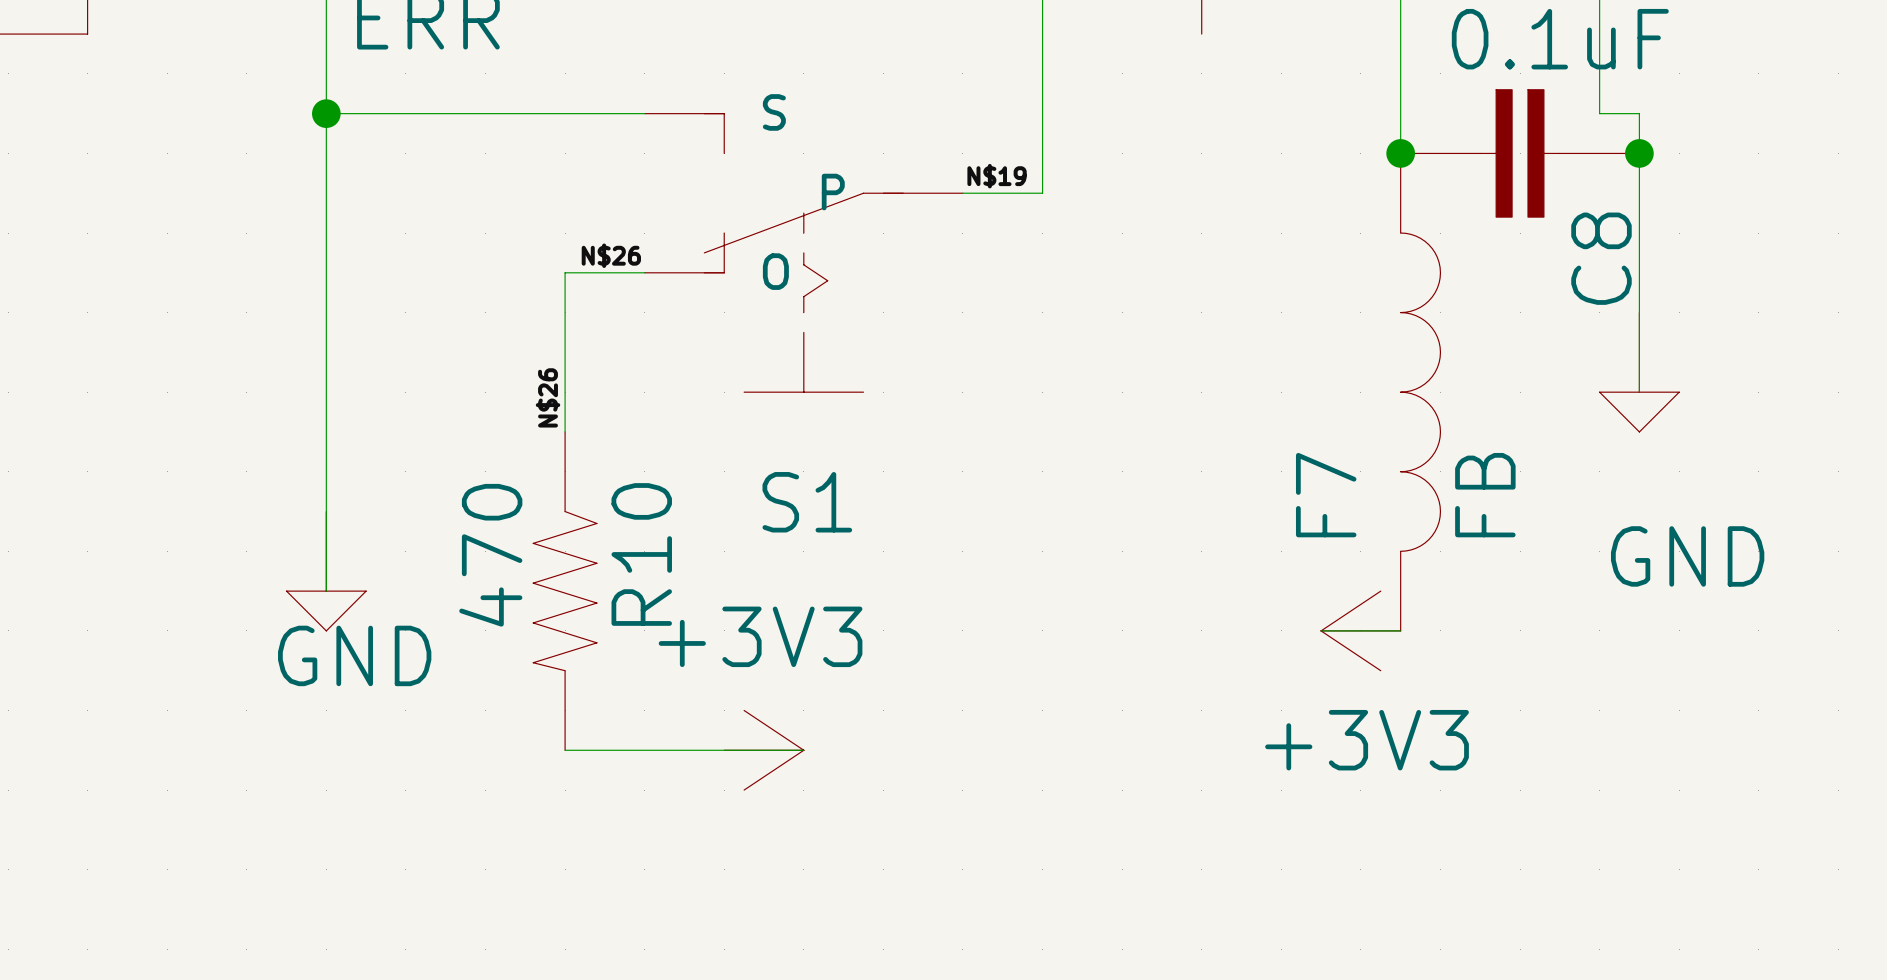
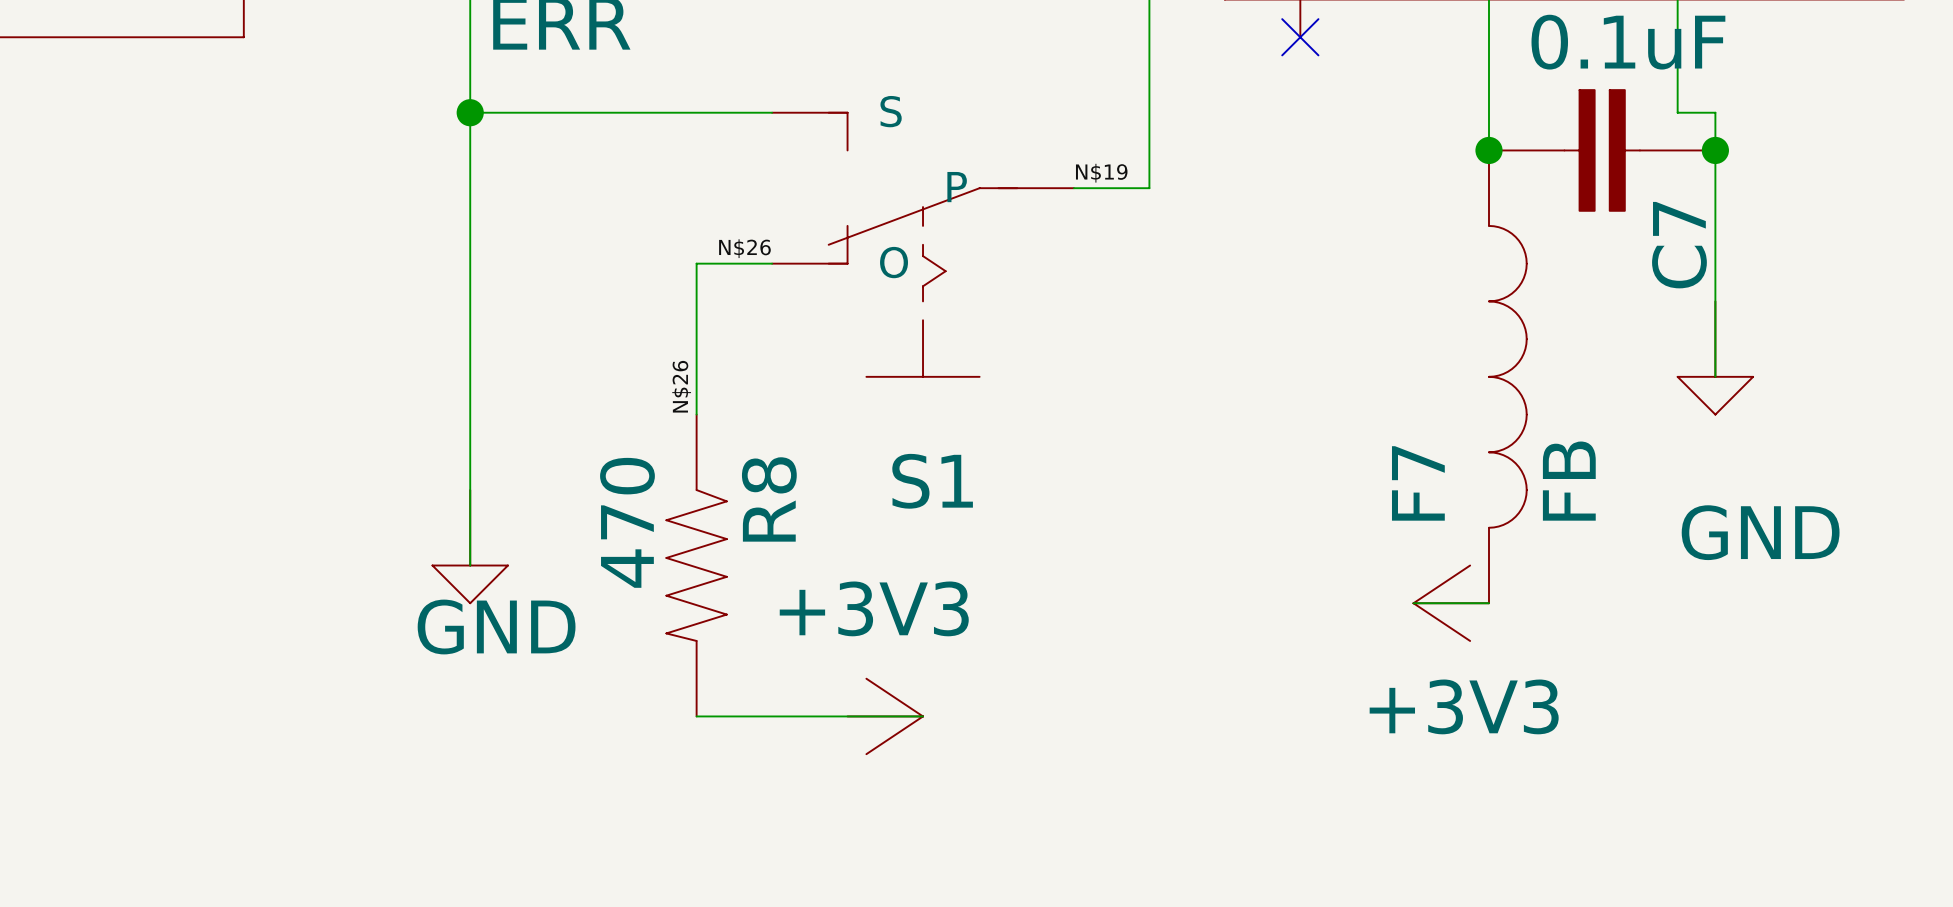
no-connect mark: none -> (1300, 37)
C8 name: C8 (1601, 258) -> C7 (1679, 245)
R10 name: R10 (641, 554) -> R8 (769, 499)

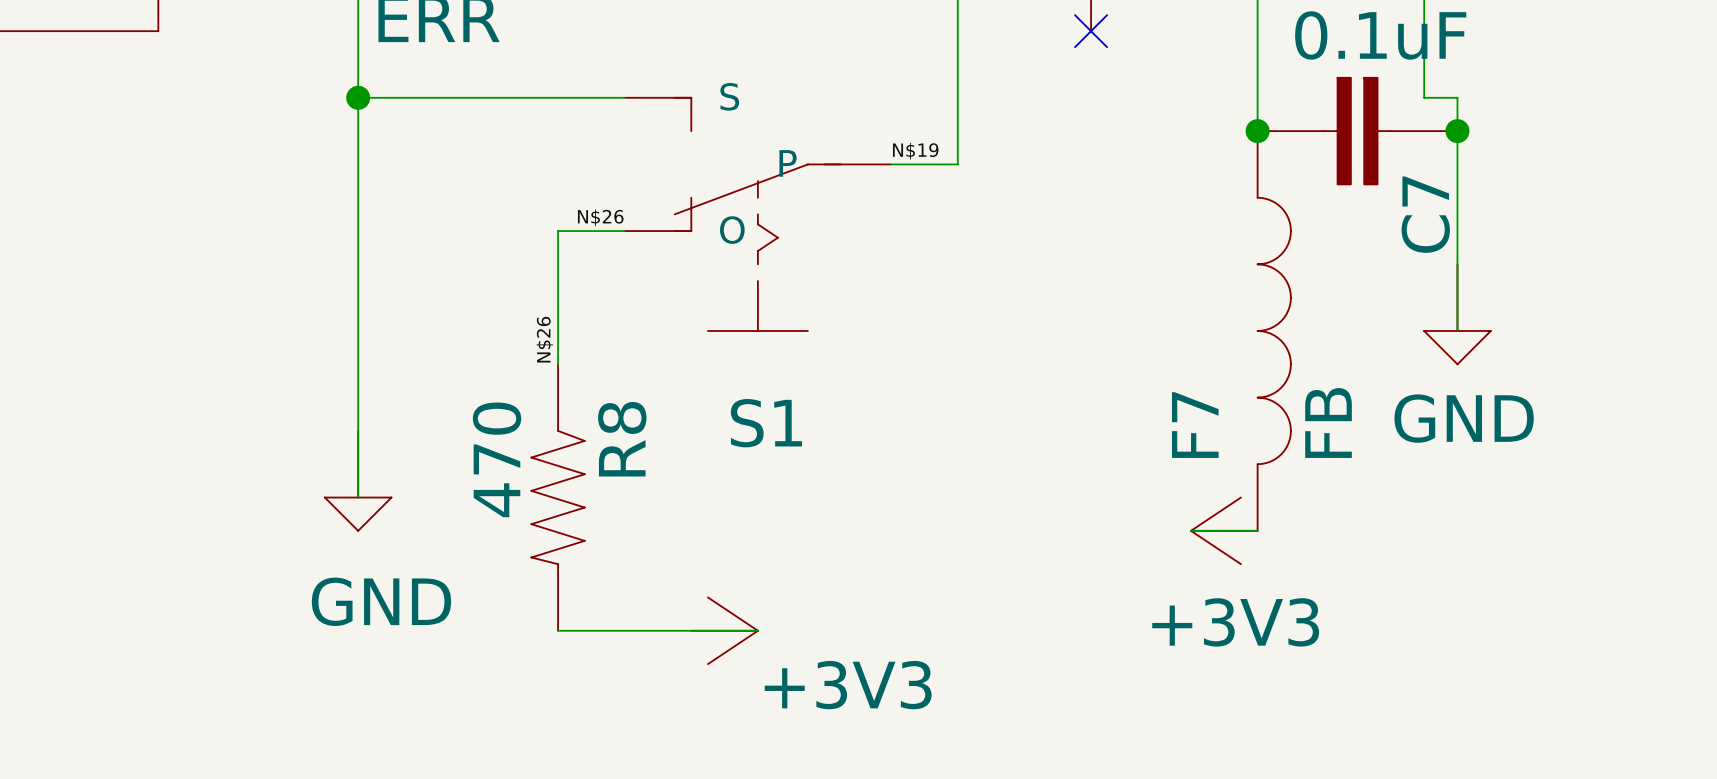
power symbol text position: GND (1760, 532) -> GND (1464, 418)
power symbol text position: +3V3 (874, 608) -> +3V3 (848, 685)
power symbol text position: GND (496, 627) -> GND (381, 601)

